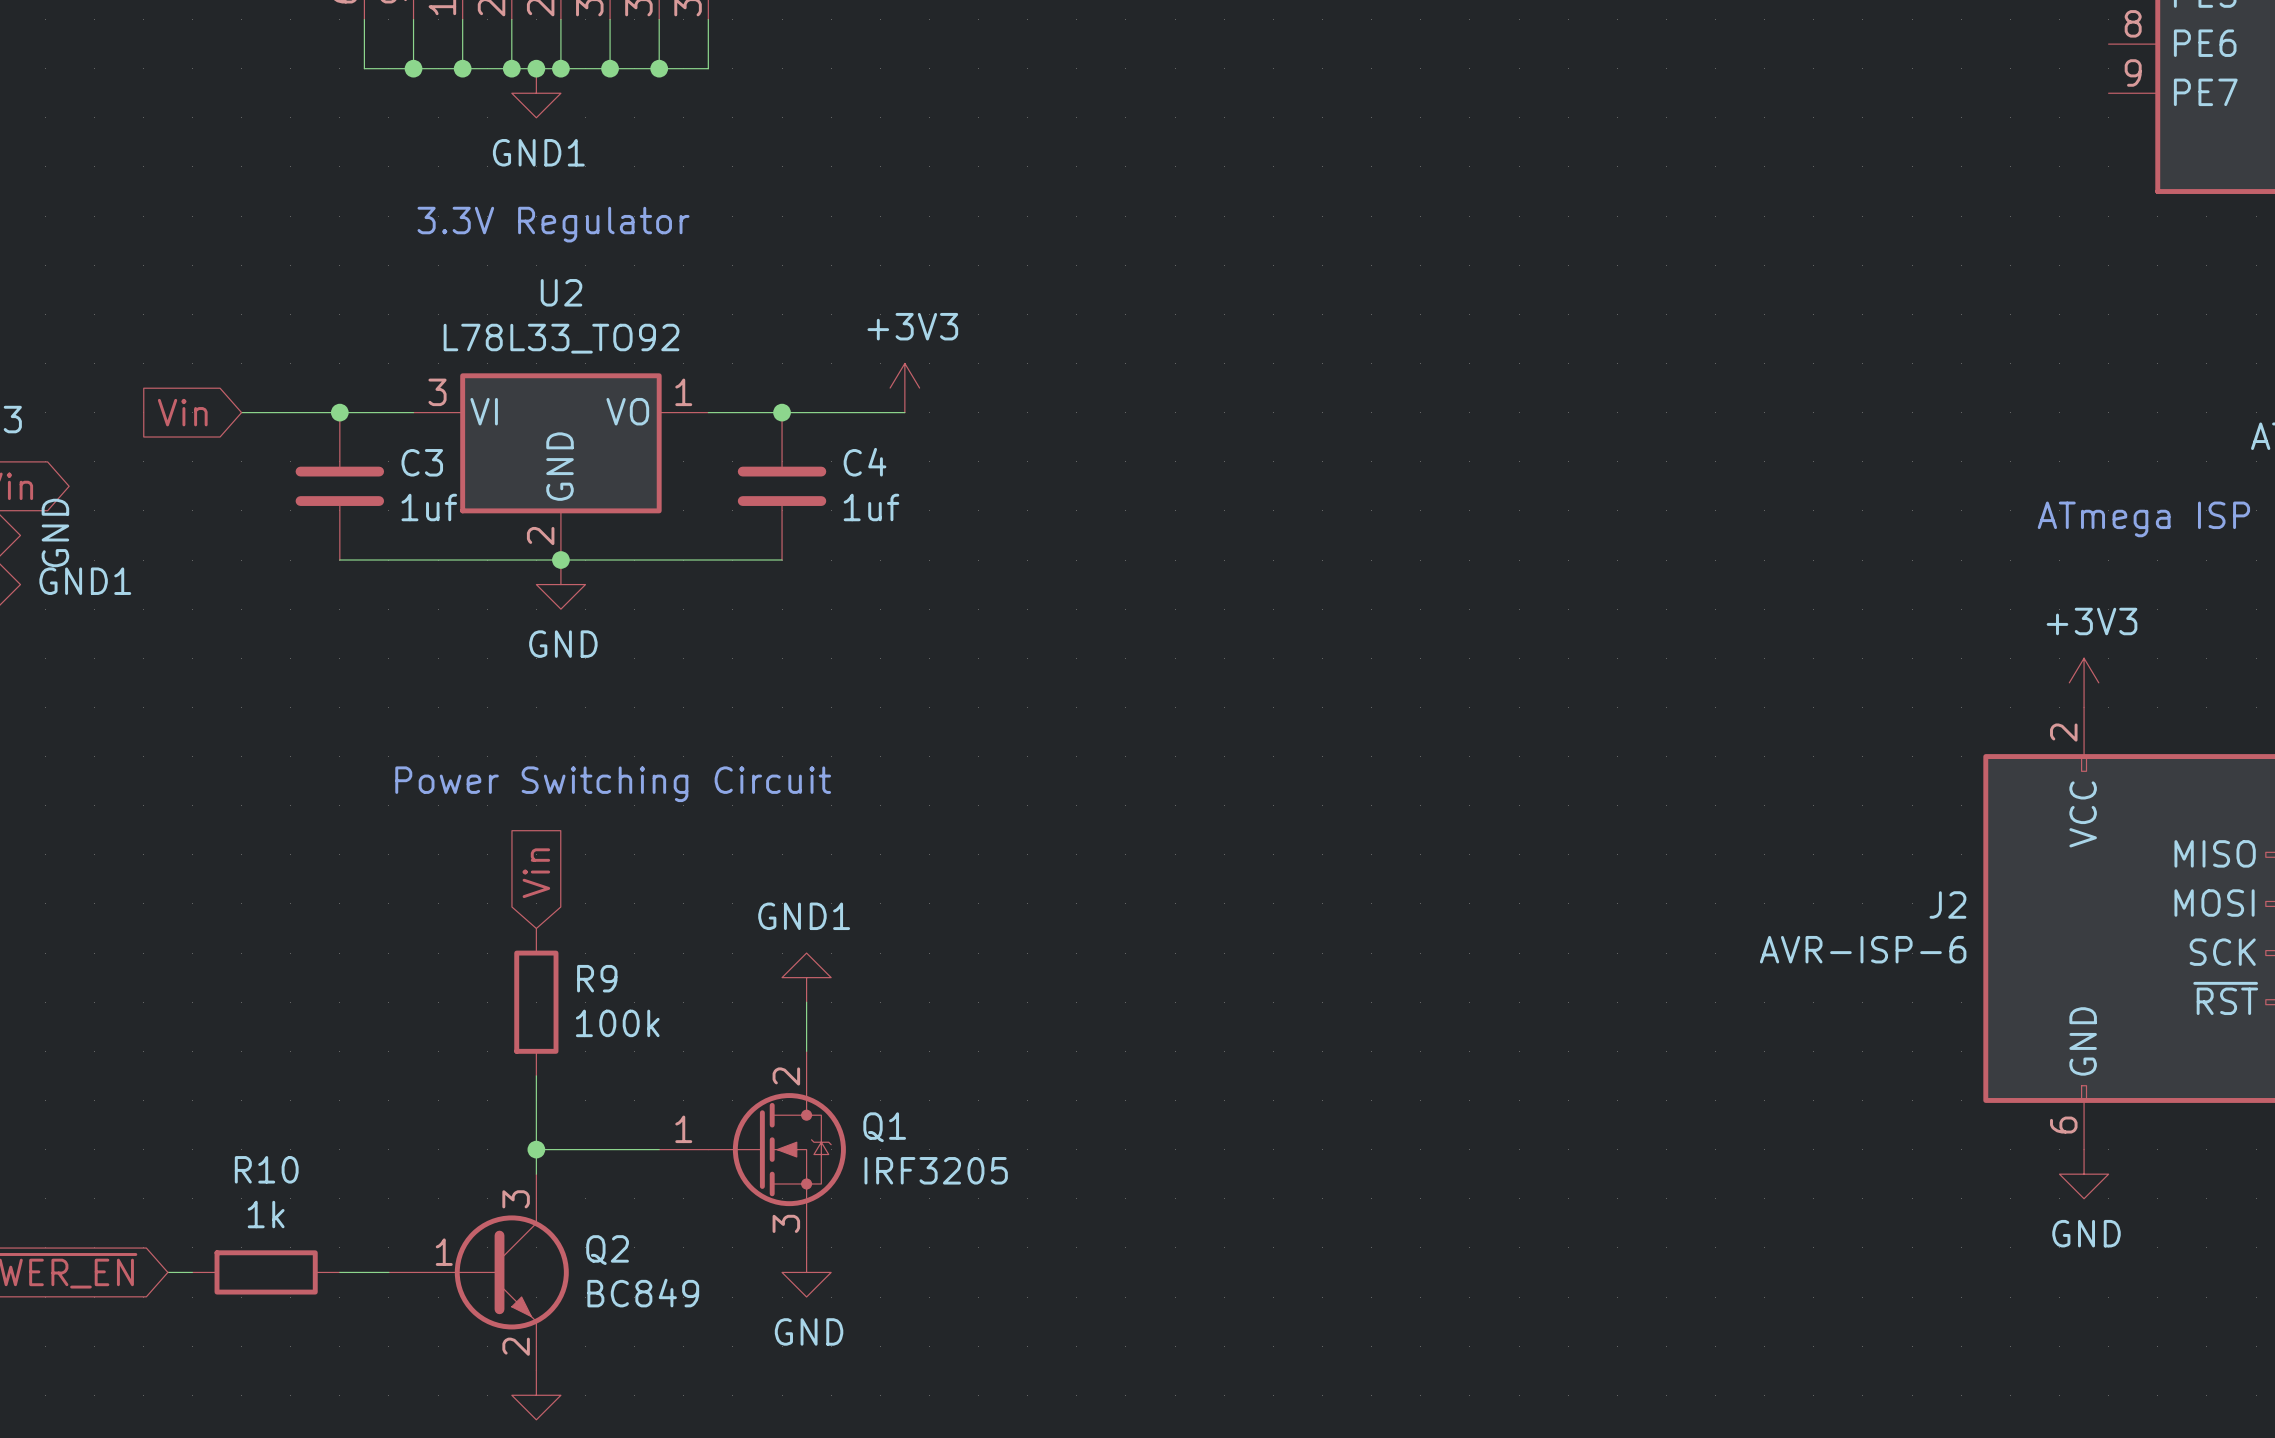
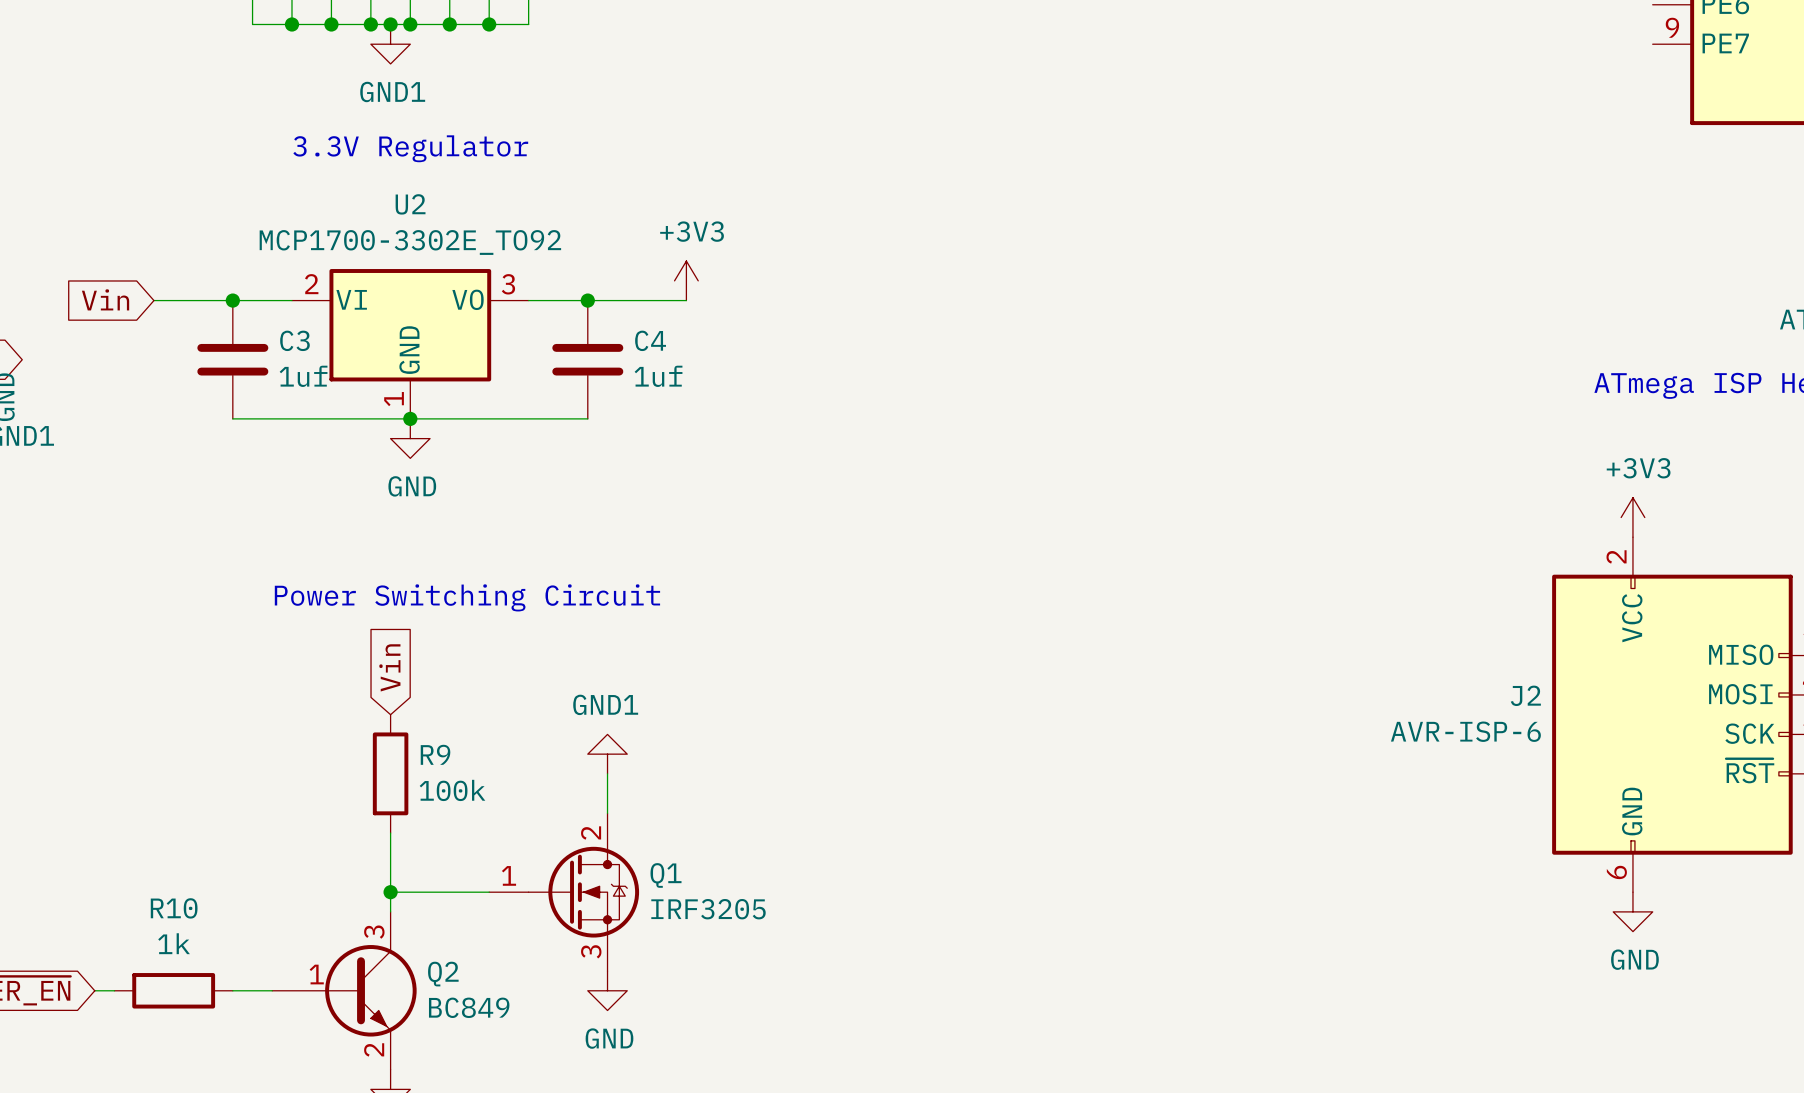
U2 value: L78L33_TO92 (561, 338) -> MCP1700-3302E_TO92 (410, 242)
U2 pin number: 3 (437, 392) -> 2 (311, 284)
U2 pin number: 1 (683, 392) -> 3 (508, 284)
U2 pin number: 2 (540, 536) -> 1 (394, 399)

